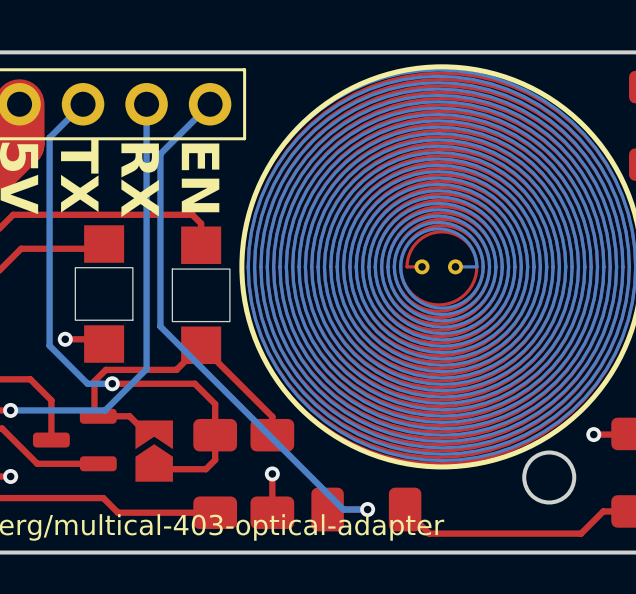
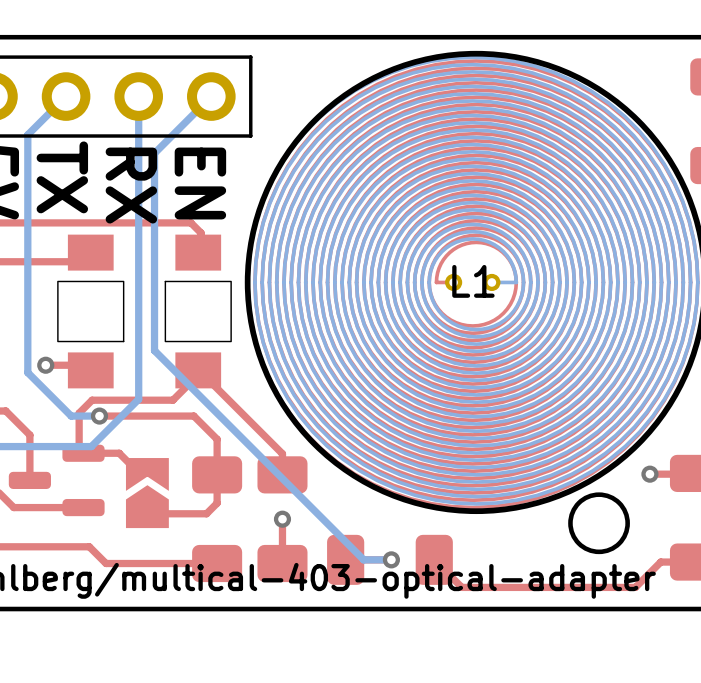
part footprint: [74, 225, 134, 363] -> [57, 234, 125, 389]
part footprint: [171, 226, 231, 365] -> [164, 234, 232, 389]
L1 name: none -> L1 (473, 281)

